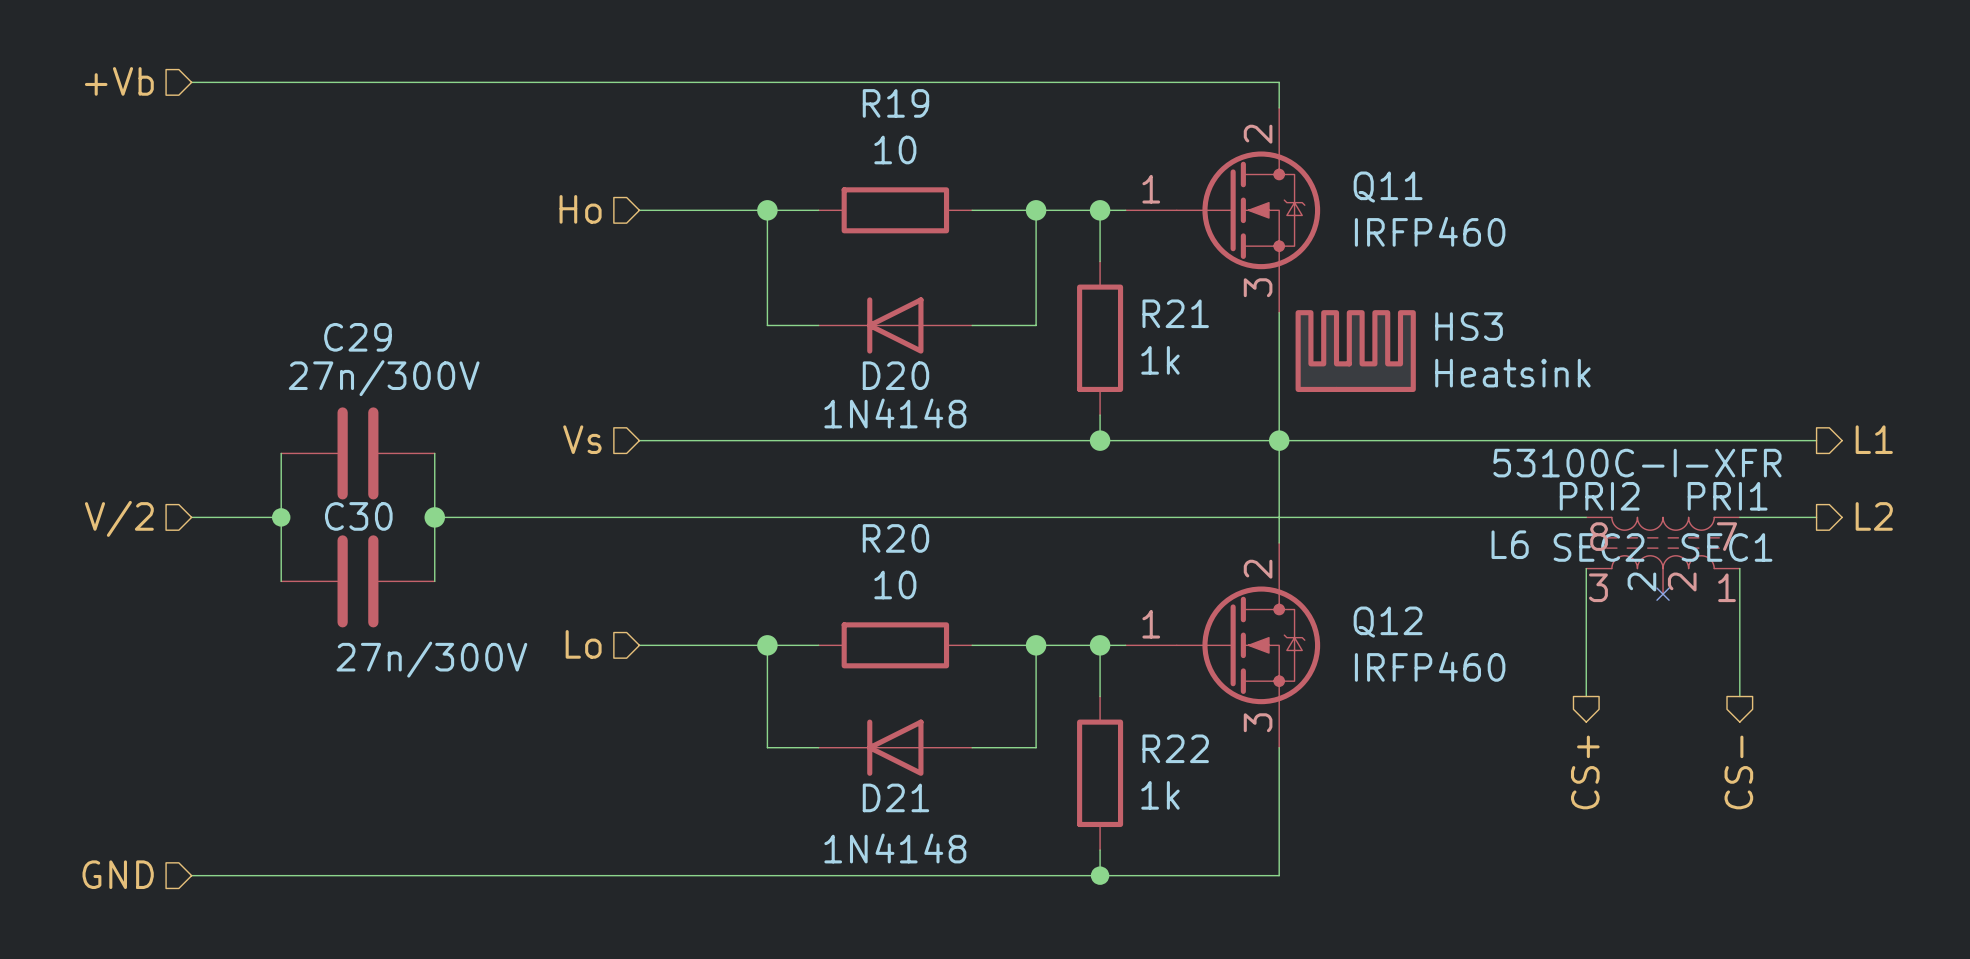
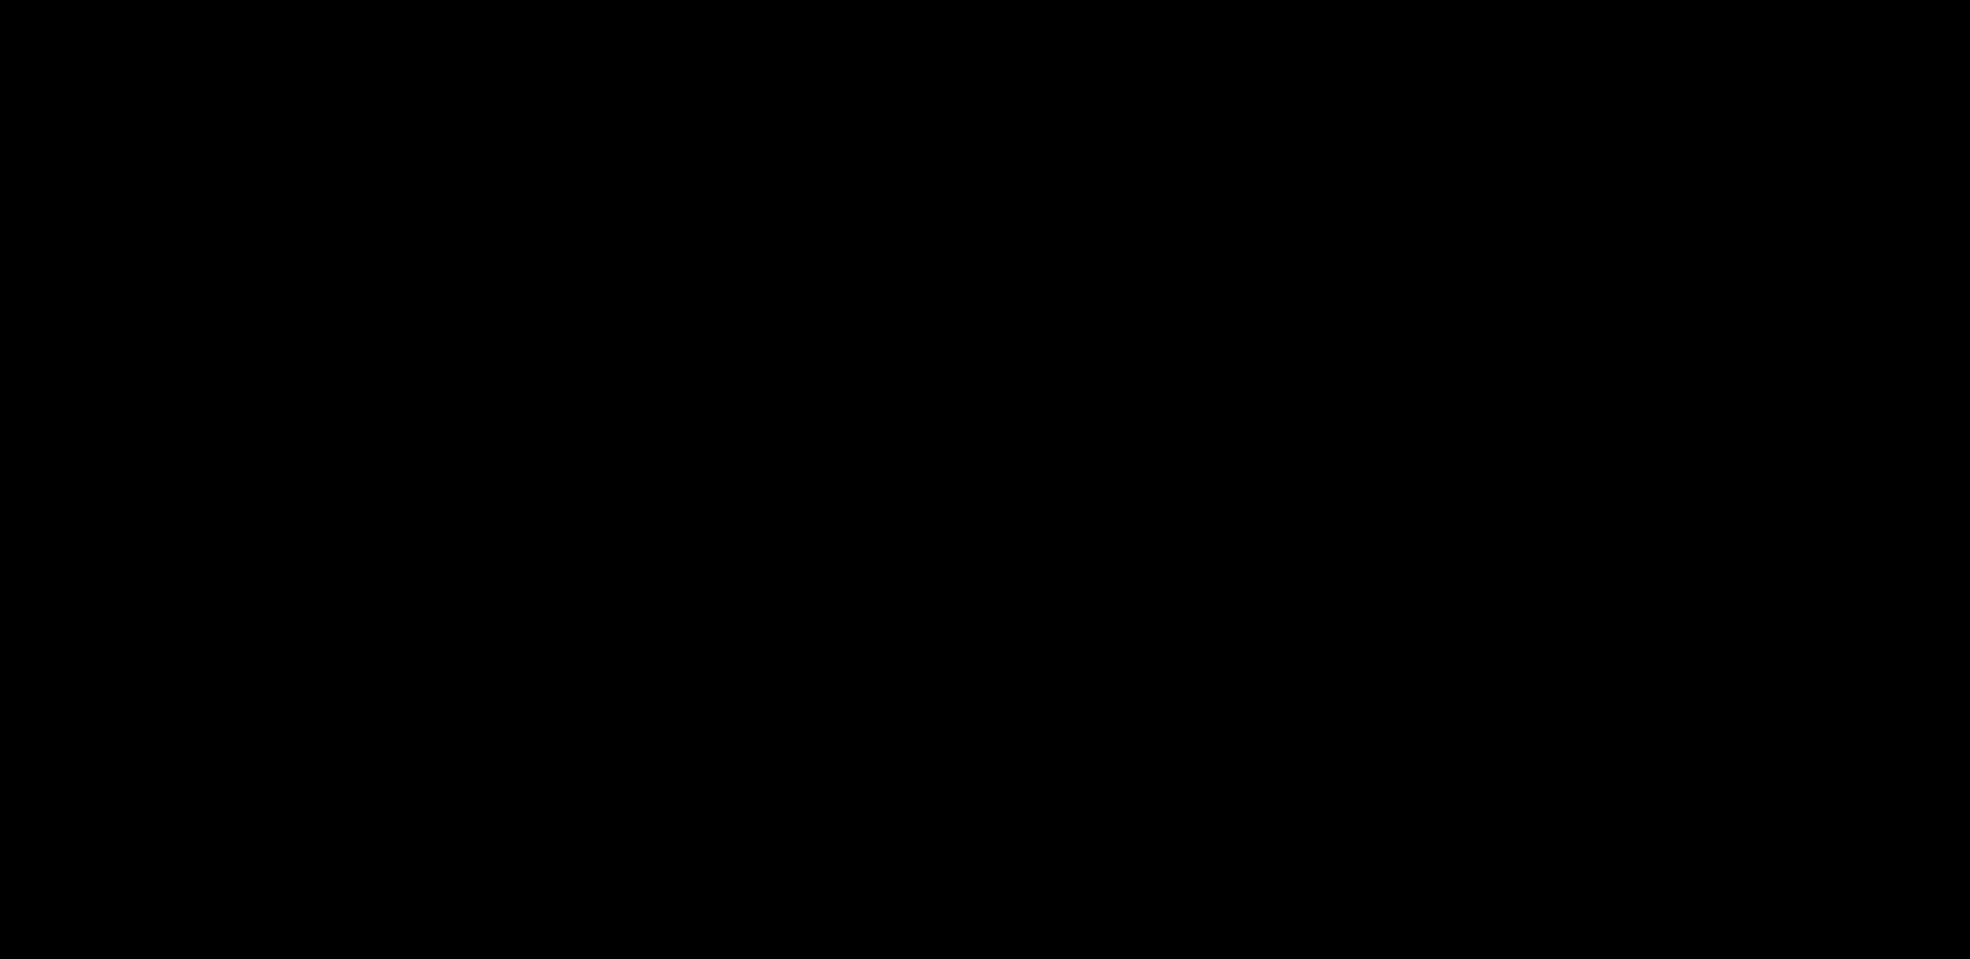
hierarchical label: +Vb (119, 81) -> none
wire: (191, 82) (1279, 82) (1279, 107) -> none
hierarchical label: Ho (580, 209) -> none
wire: (639, 210) (818, 210) -> none
wire: (767, 210) (767, 325) (818, 325) -> none
junction: (767, 210) -> none
R19: 10 (895, 210) -> none
wire: (972, 210) (1125, 210) -> none
wire: (1036, 210) (1036, 325) (972, 325) -> none
junction: (1036, 210) -> none
wire: (1100, 210) (1100, 261) -> none
junction: (1100, 210) -> none
Q11: IRFP460 (1222, 210) -> none
wire: (1279, 312) (1279, 542) -> none
D20: 1N4148 (895, 325) -> none
R21: 1k (1100, 338) -> none
HS3: Heatsink (1355, 351) -> none
wire: (1100, 415) (1100, 440) -> none
hierarchical label: Vs (582, 439) -> none
hierarchical label: L1 (1874, 439) -> none
wire: (639, 440) (1816, 440) -> none
junction: (1100, 440) -> none
junction: (1279, 440) -> none
wire: (281, 453) (281, 581) -> none
C29: 27n/300V (357, 453) -> none
wire: (434, 453) (434, 581) -> none
hierarchical label: L2 (1874, 516) -> none
wire: (191, 517) (281, 517) -> none
junction: (281, 517) -> none
wire: (434, 517) (1586, 517) -> none
junction: (434, 517) -> none
wire: (1739, 517) (1816, 517) -> none
hierarchical label: V/2 (119, 518) -> none
L6: 53100C-I-XFR (1663, 558) -> none
wire: (1586, 568) (1586, 696) -> none
wire: (1739, 568) (1739, 696) -> none
C30: 27n/300V (357, 581) -> none
hierarchical label: Lo (583, 644) -> none
wire: (639, 645) (818, 645) -> none
wire: (767, 645) (767, 747) (818, 747) -> none
junction: (767, 645) -> none
R20: 10 (895, 645) -> none
wire: (972, 645) (1125, 645) -> none
wire: (1036, 645) (1036, 747) (972, 747) -> none
junction: (1036, 645) -> none
wire: (1100, 645) (1100, 696) -> none
junction: (1100, 645) -> none
Q12: IRFP460 (1222, 645) -> none
D21: 1N4148 (895, 747) -> none
wire: (1279, 747) (1279, 875) (191, 875) -> none
hierarchical label: CS+ (1585, 772) -> none
hierarchical label: CS- (1738, 772) -> none
R22: 1k (1100, 773) -> none
wire: (1100, 850) (1100, 875) -> none
hierarchical label: GND (118, 874) -> none
junction: (1100, 875) -> none

